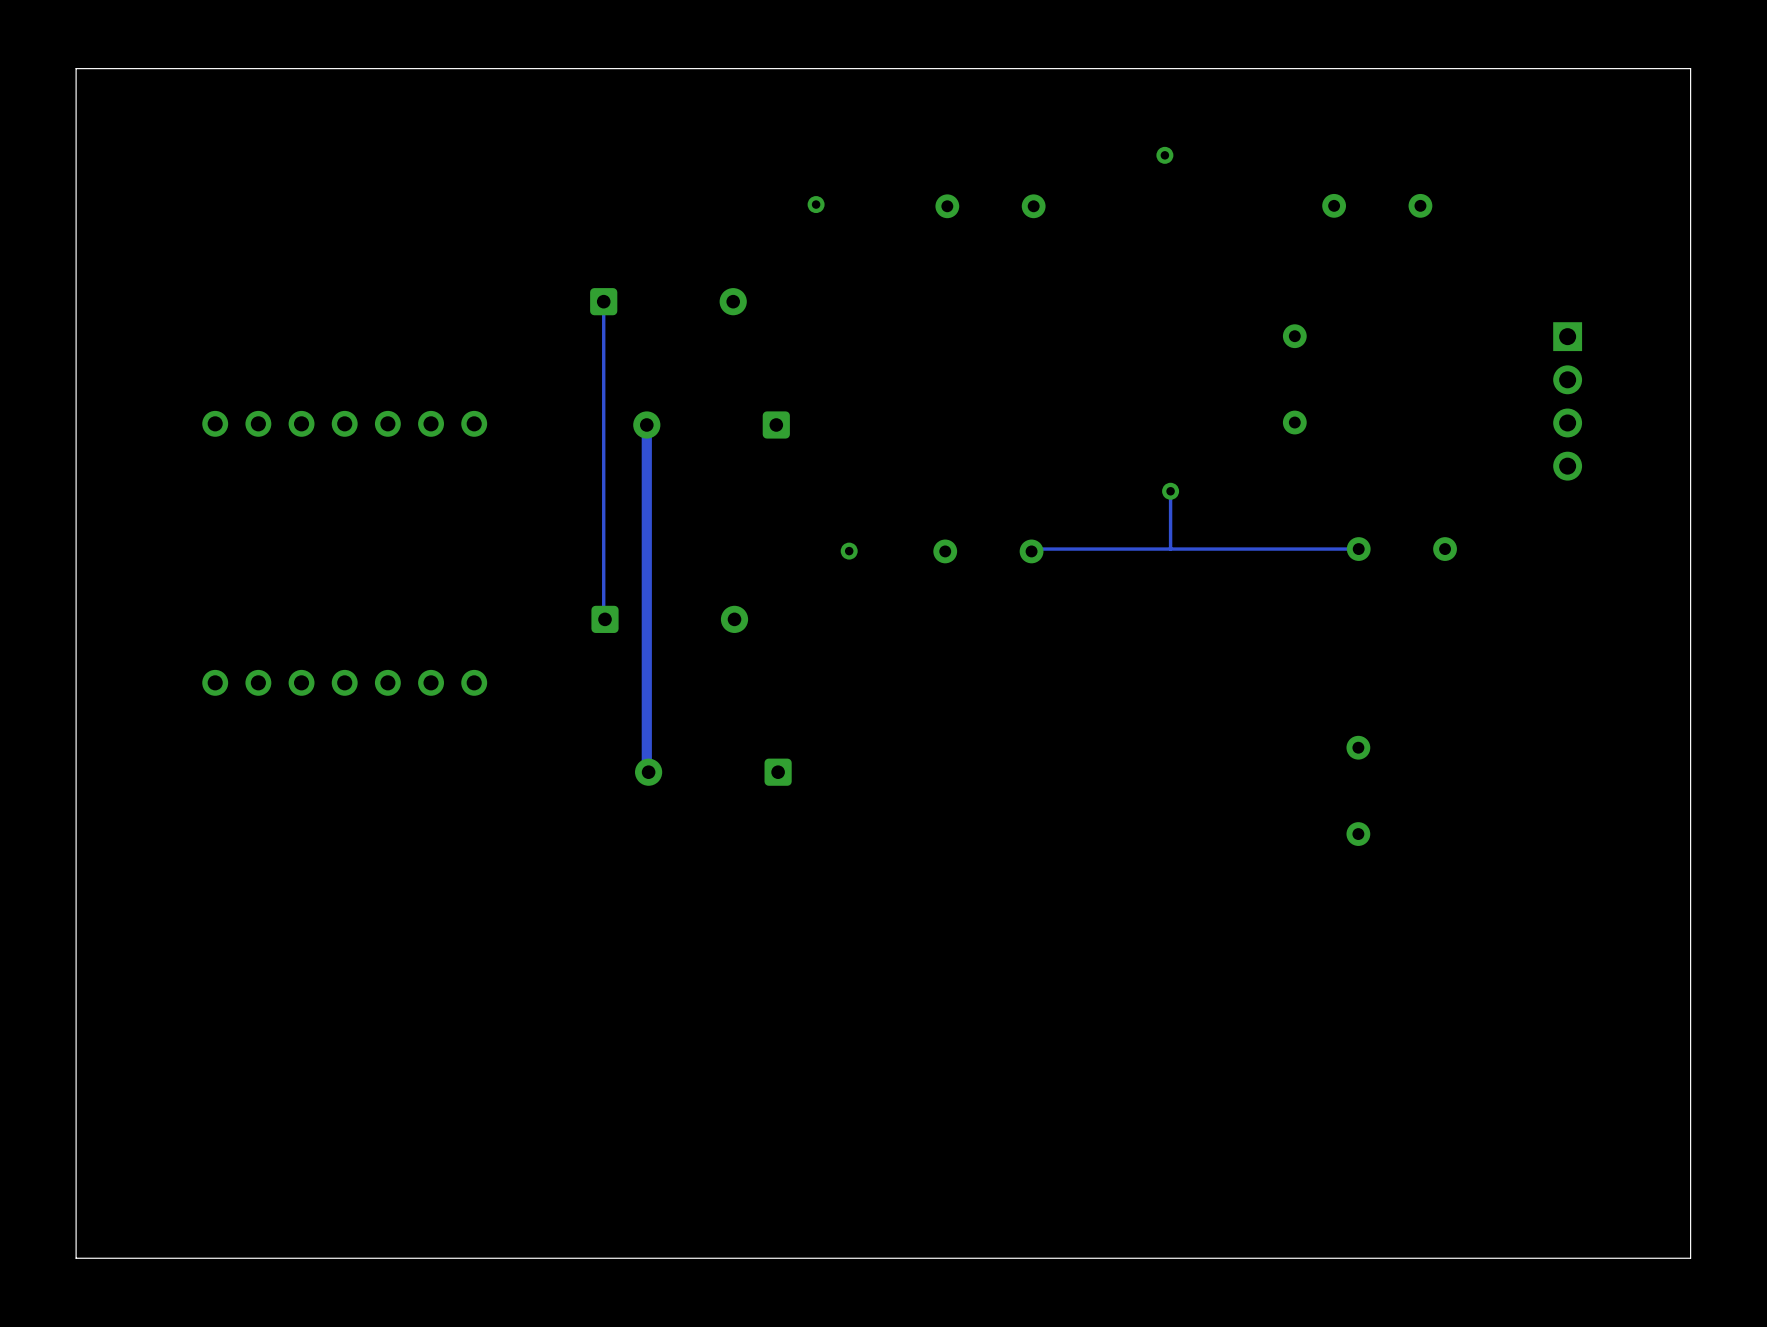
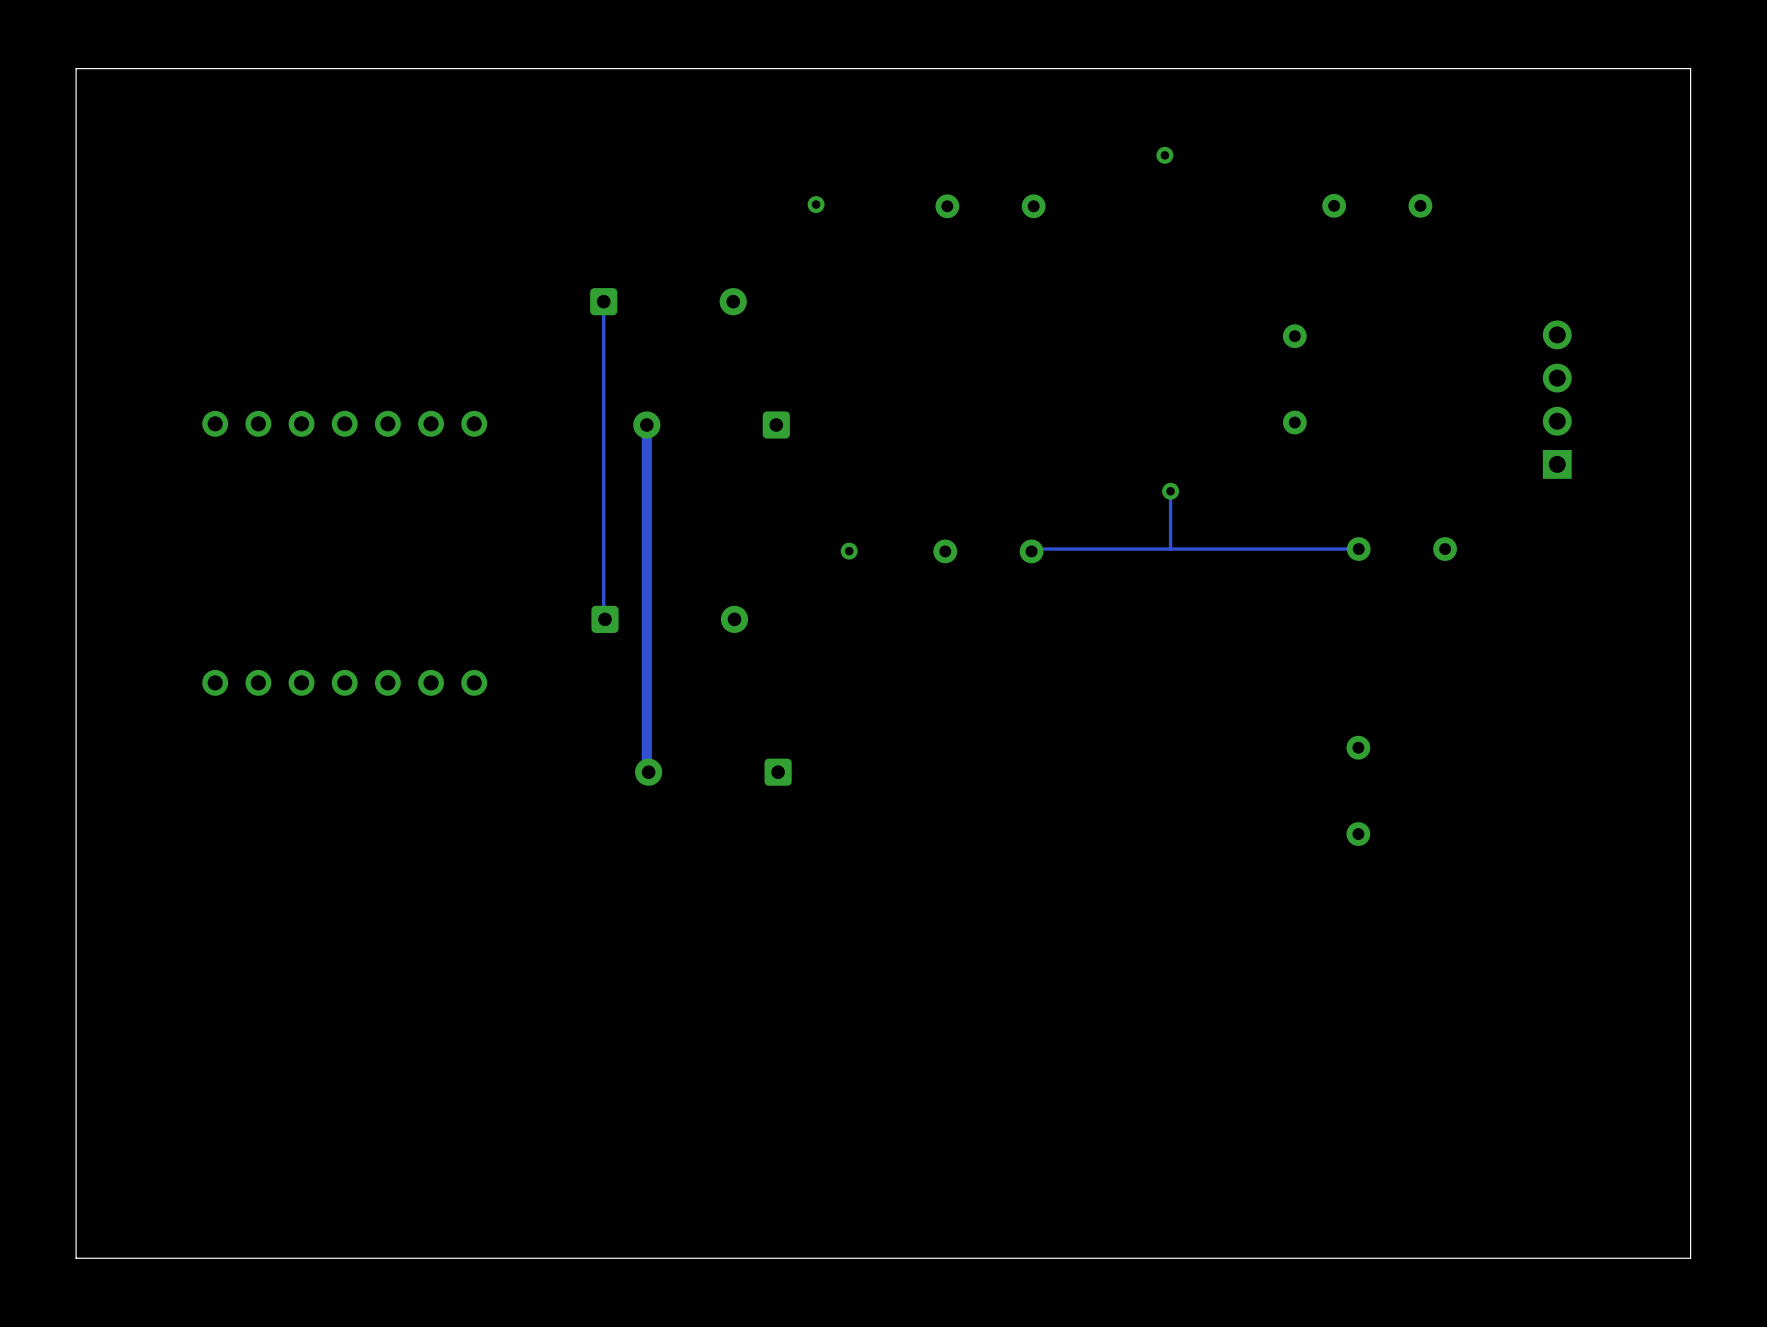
part rotation: 0° (1567, 401) -> 180° (1557, 399)

